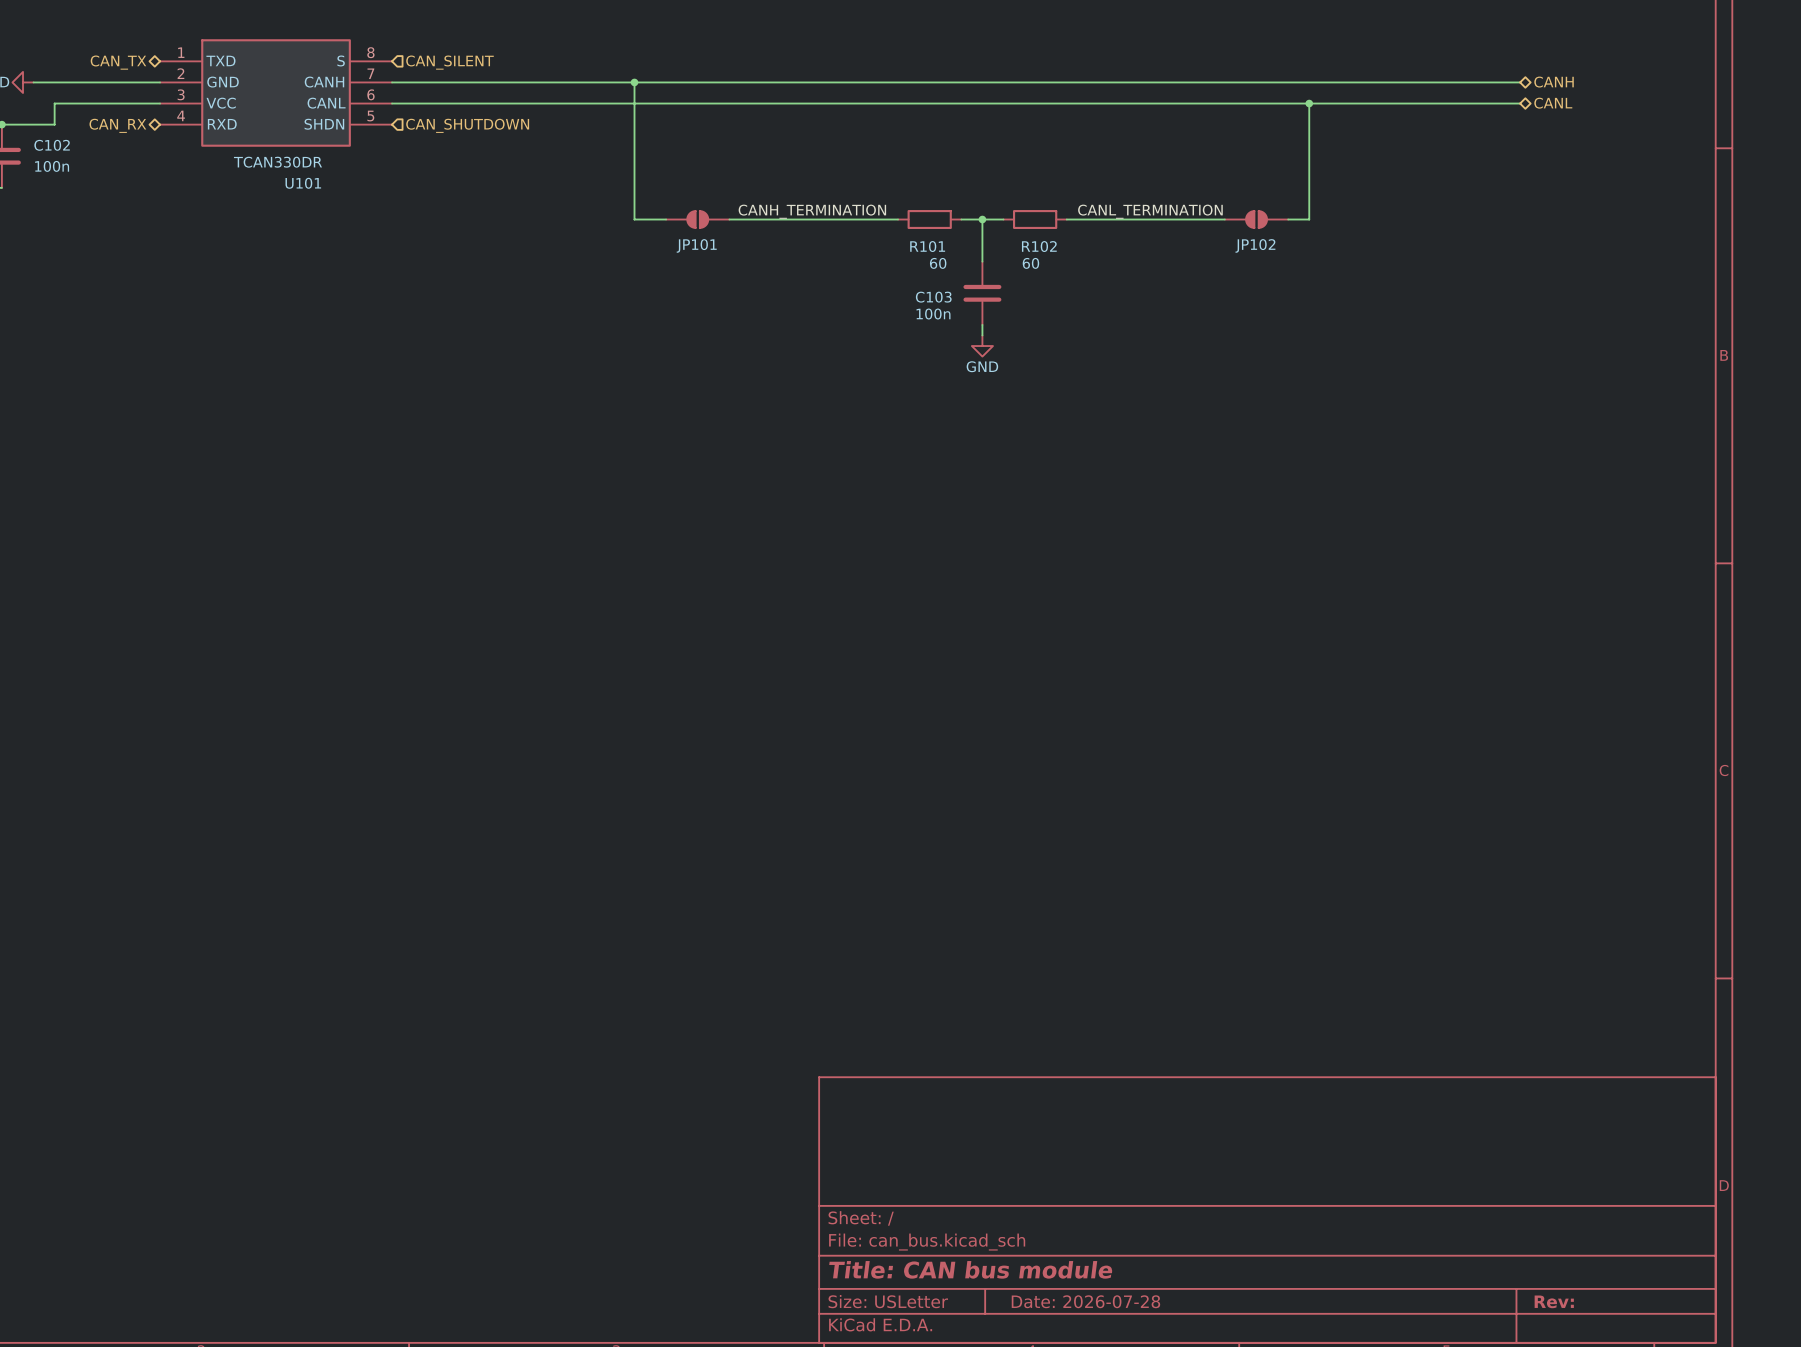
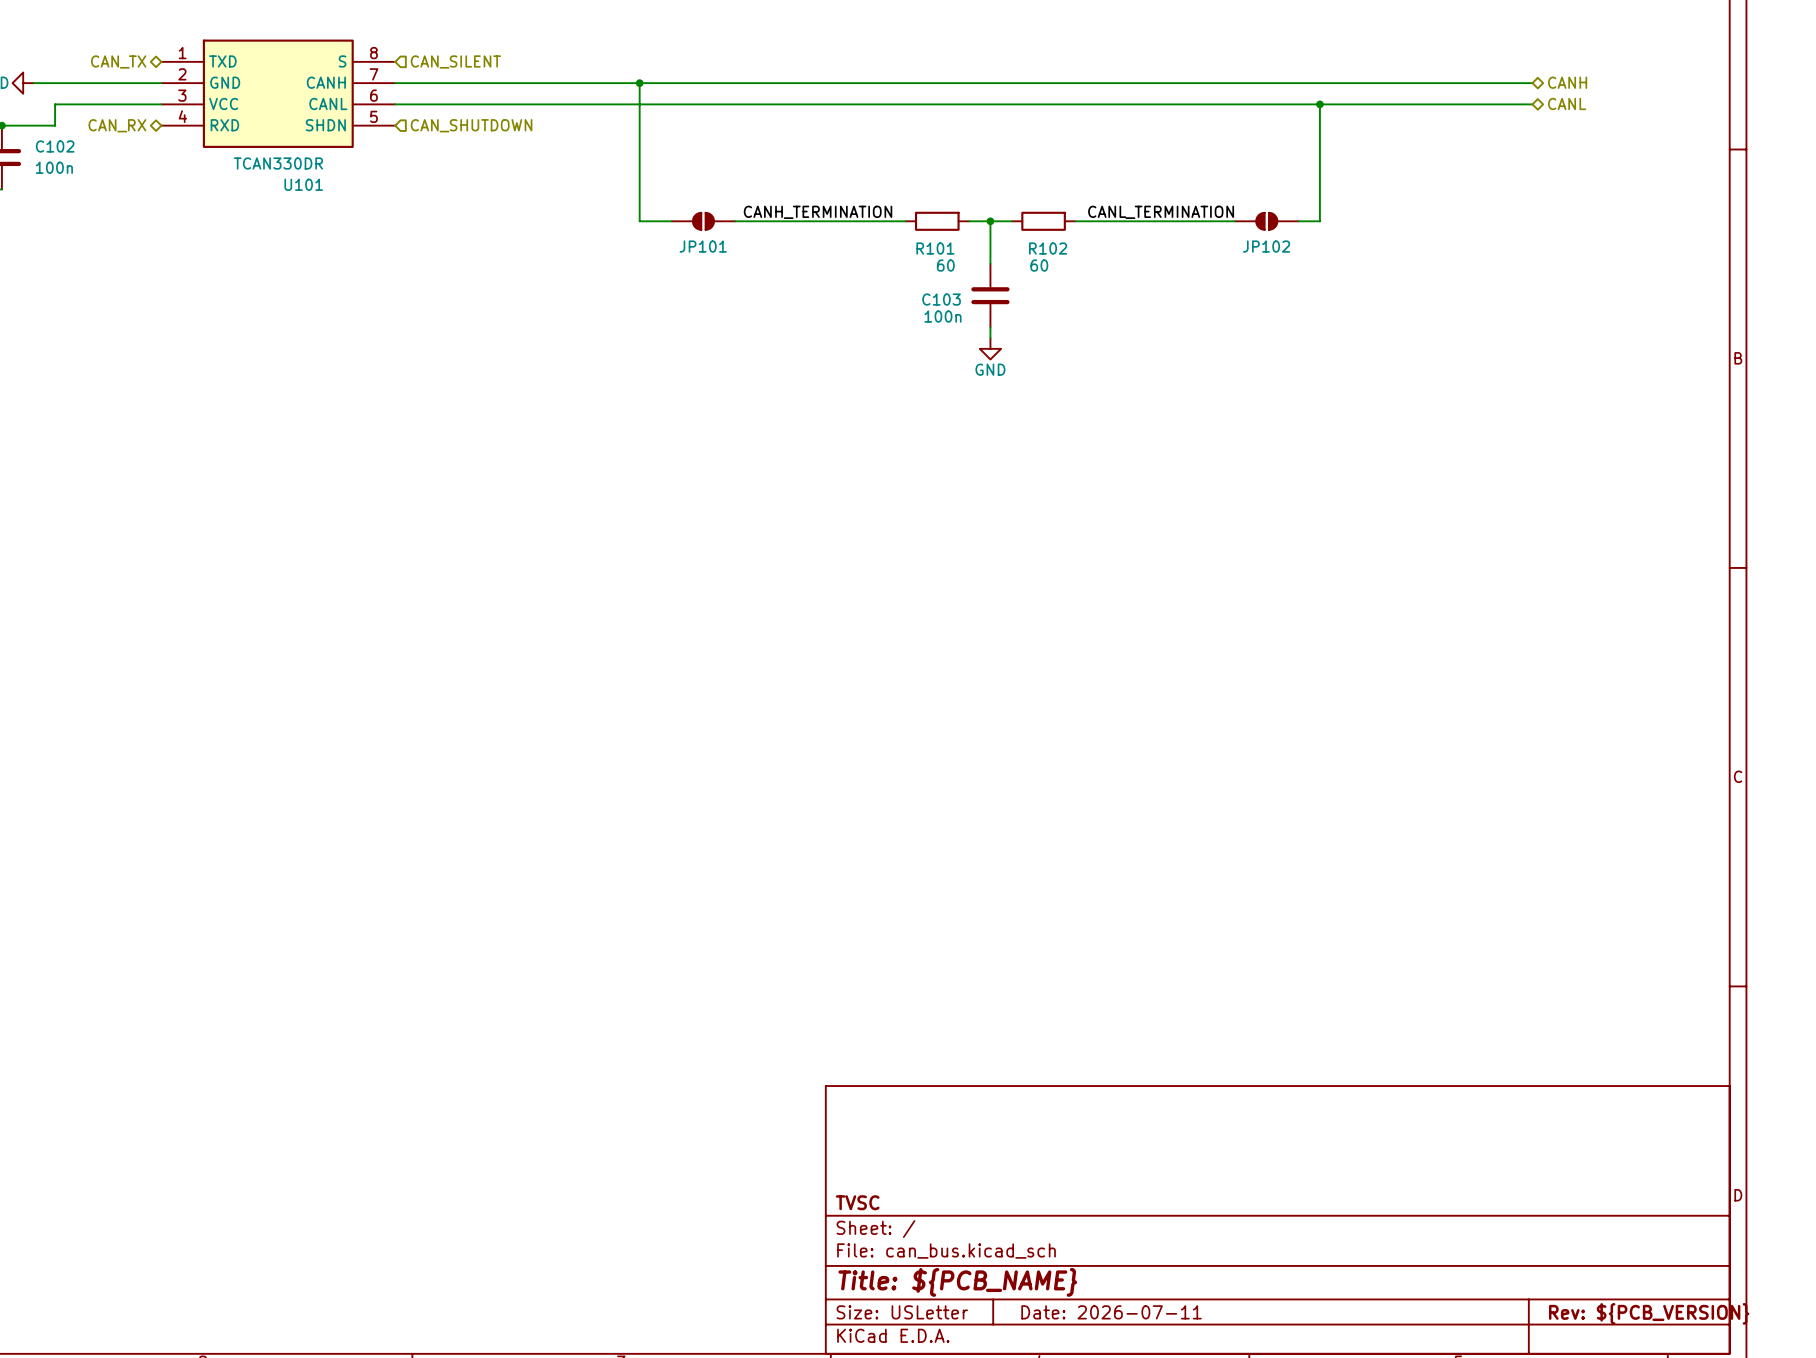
title block: none -> TVSC (857, 1202)
title block: Title: CAN bus module (970, 1269) -> Title: ${PCB_NAME} (957, 1282)
title block: Date: 2026-07-28 (1085, 1301) -> Date: 2026-07-11 (1111, 1312)
title block: Rev: (1554, 1301) -> Rev: ${PCB_VERSION} (1649, 1313)

